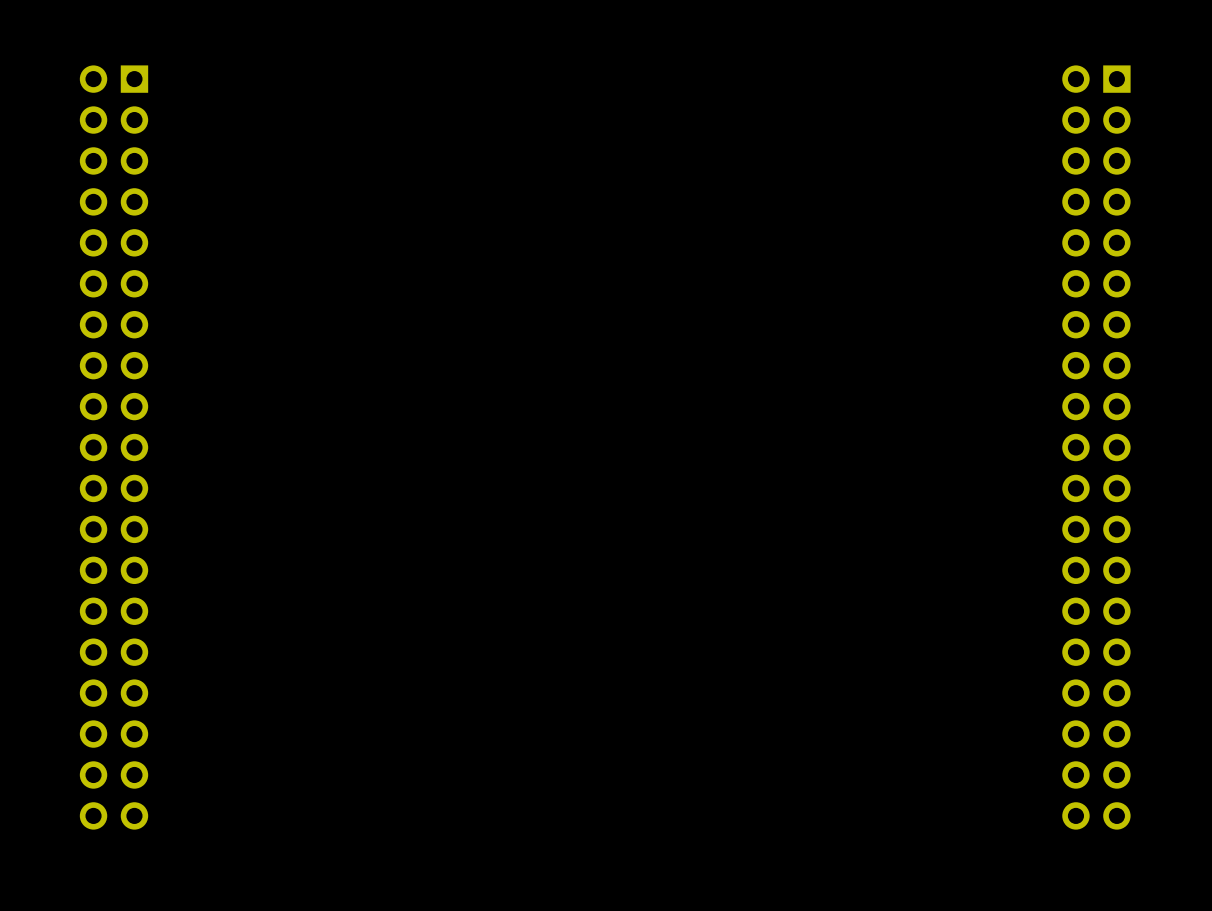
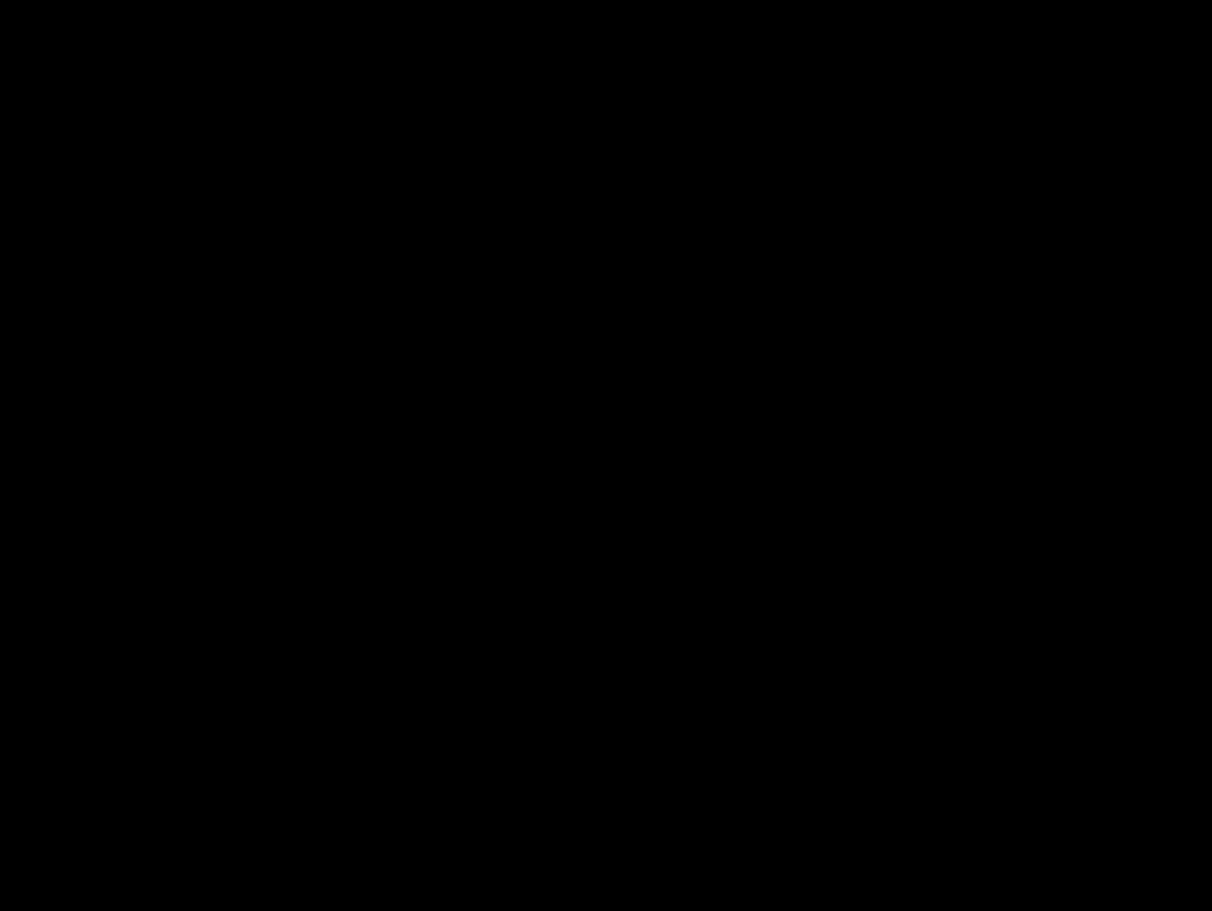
part: (114, 447) -> none
part: (1096, 447) -> none

